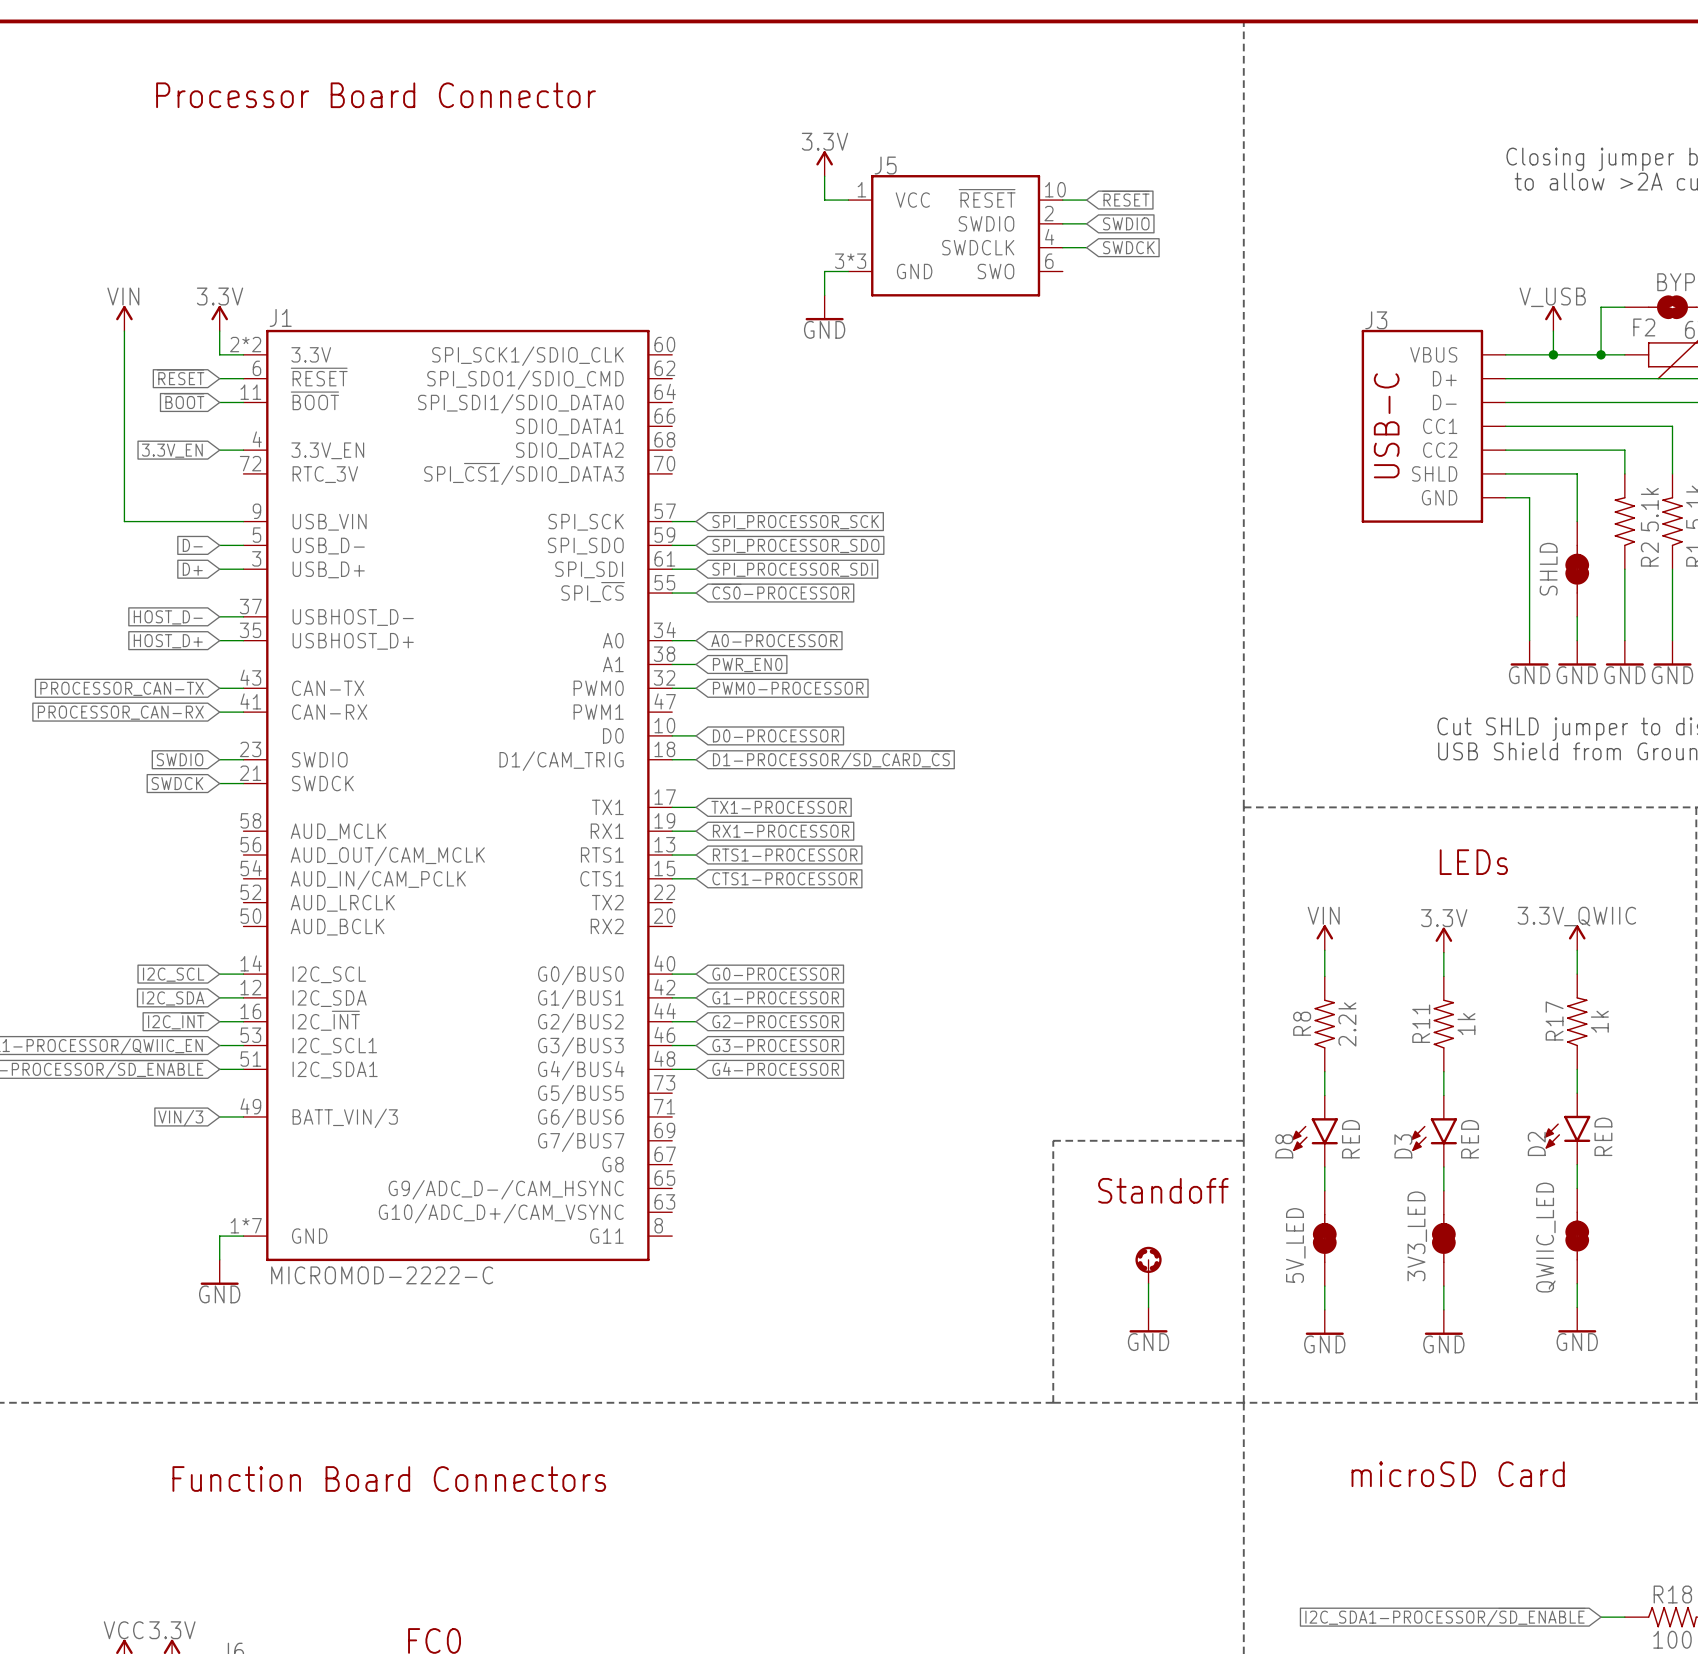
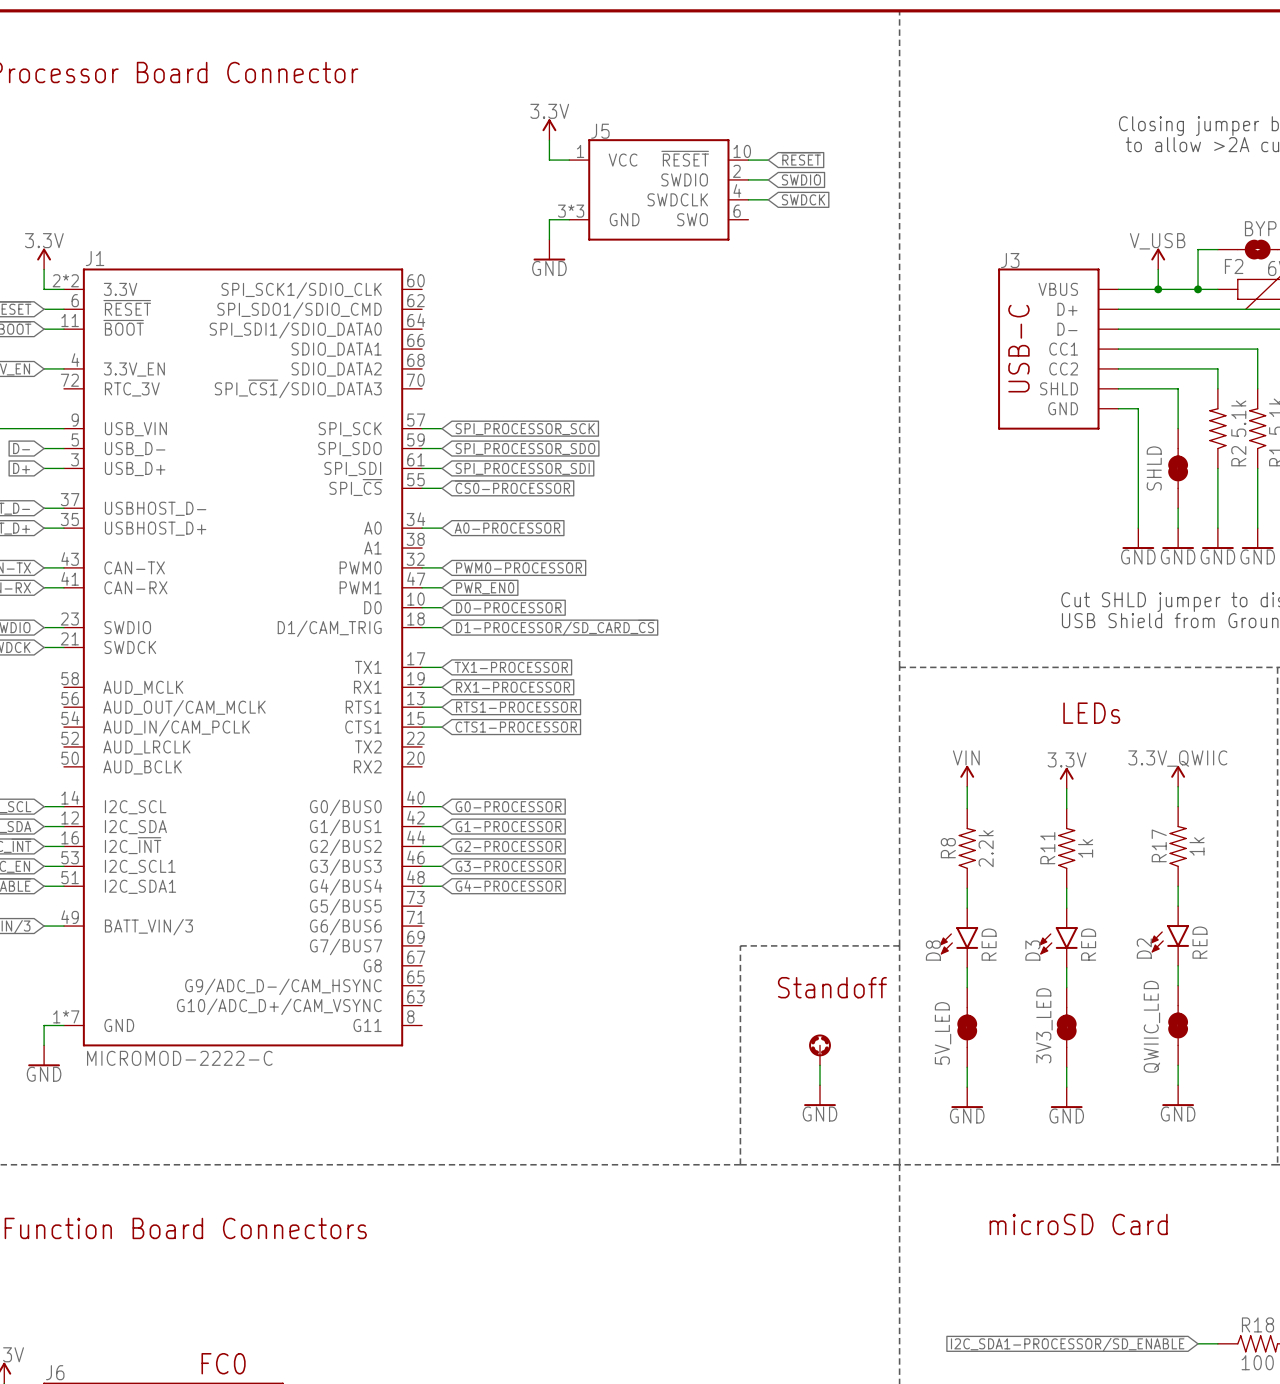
wire: (672, 664) (696, 664) -> (422, 587) (441, 587)
global label position: PWR_EN0 (747, 665) -> PWR_EN0 (485, 588)

